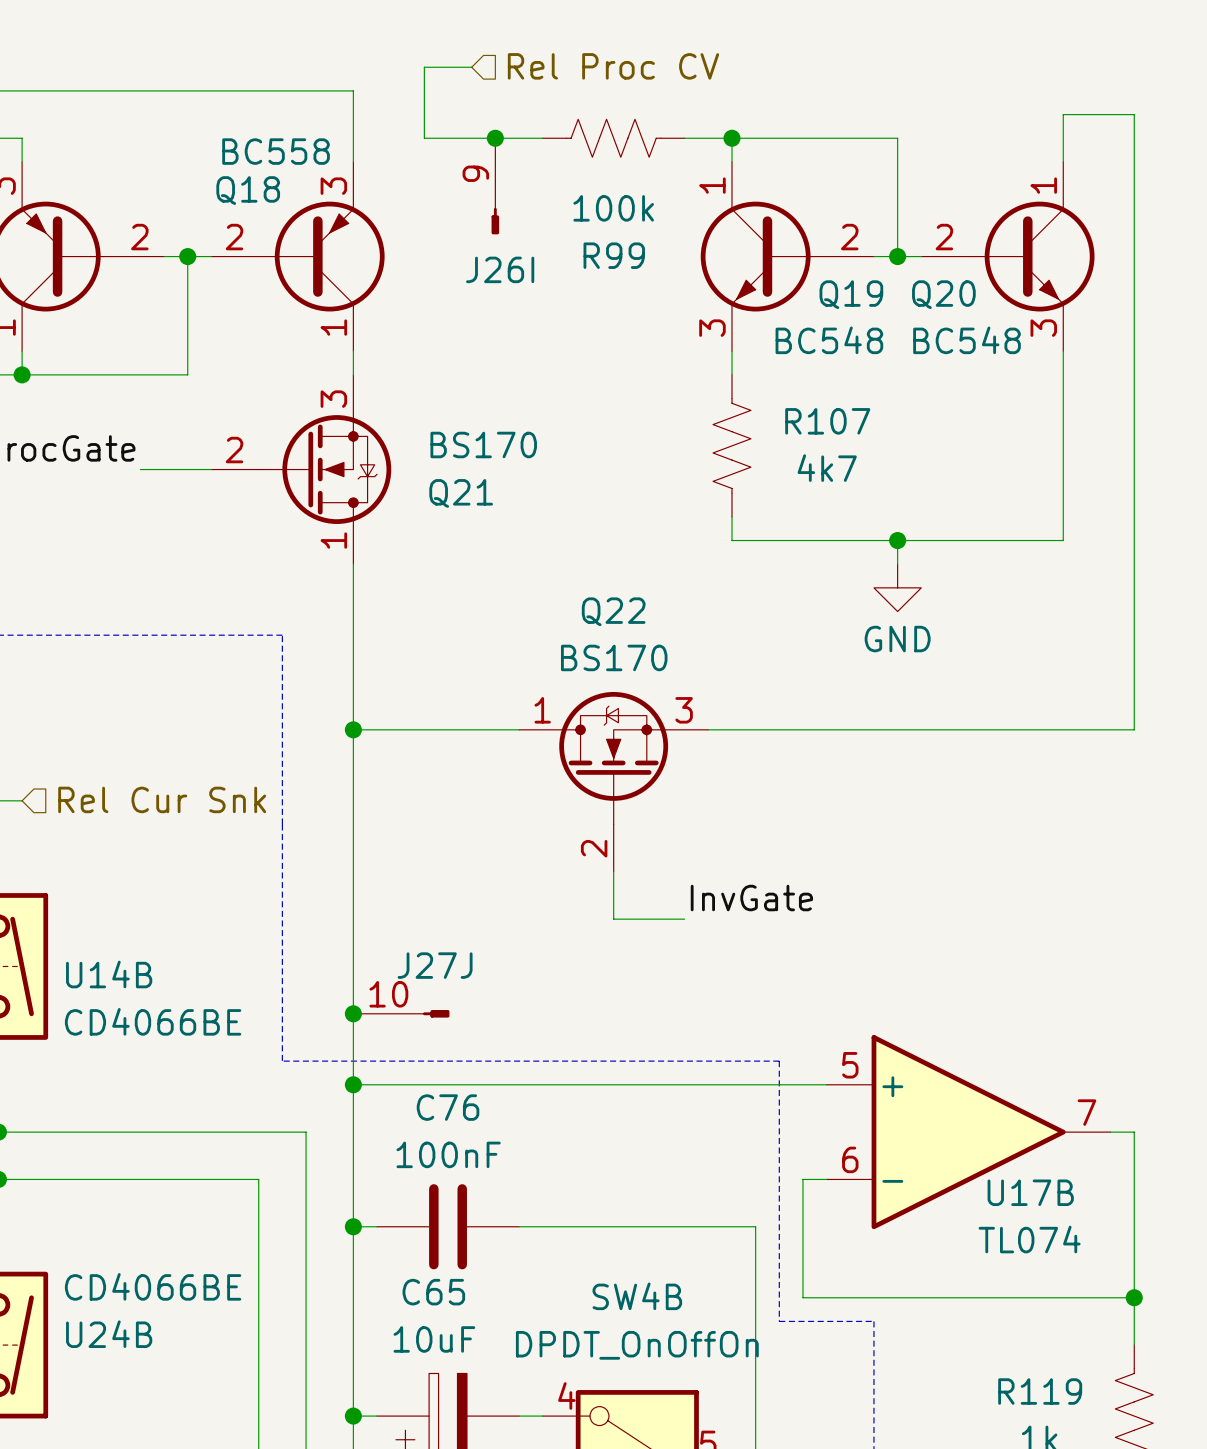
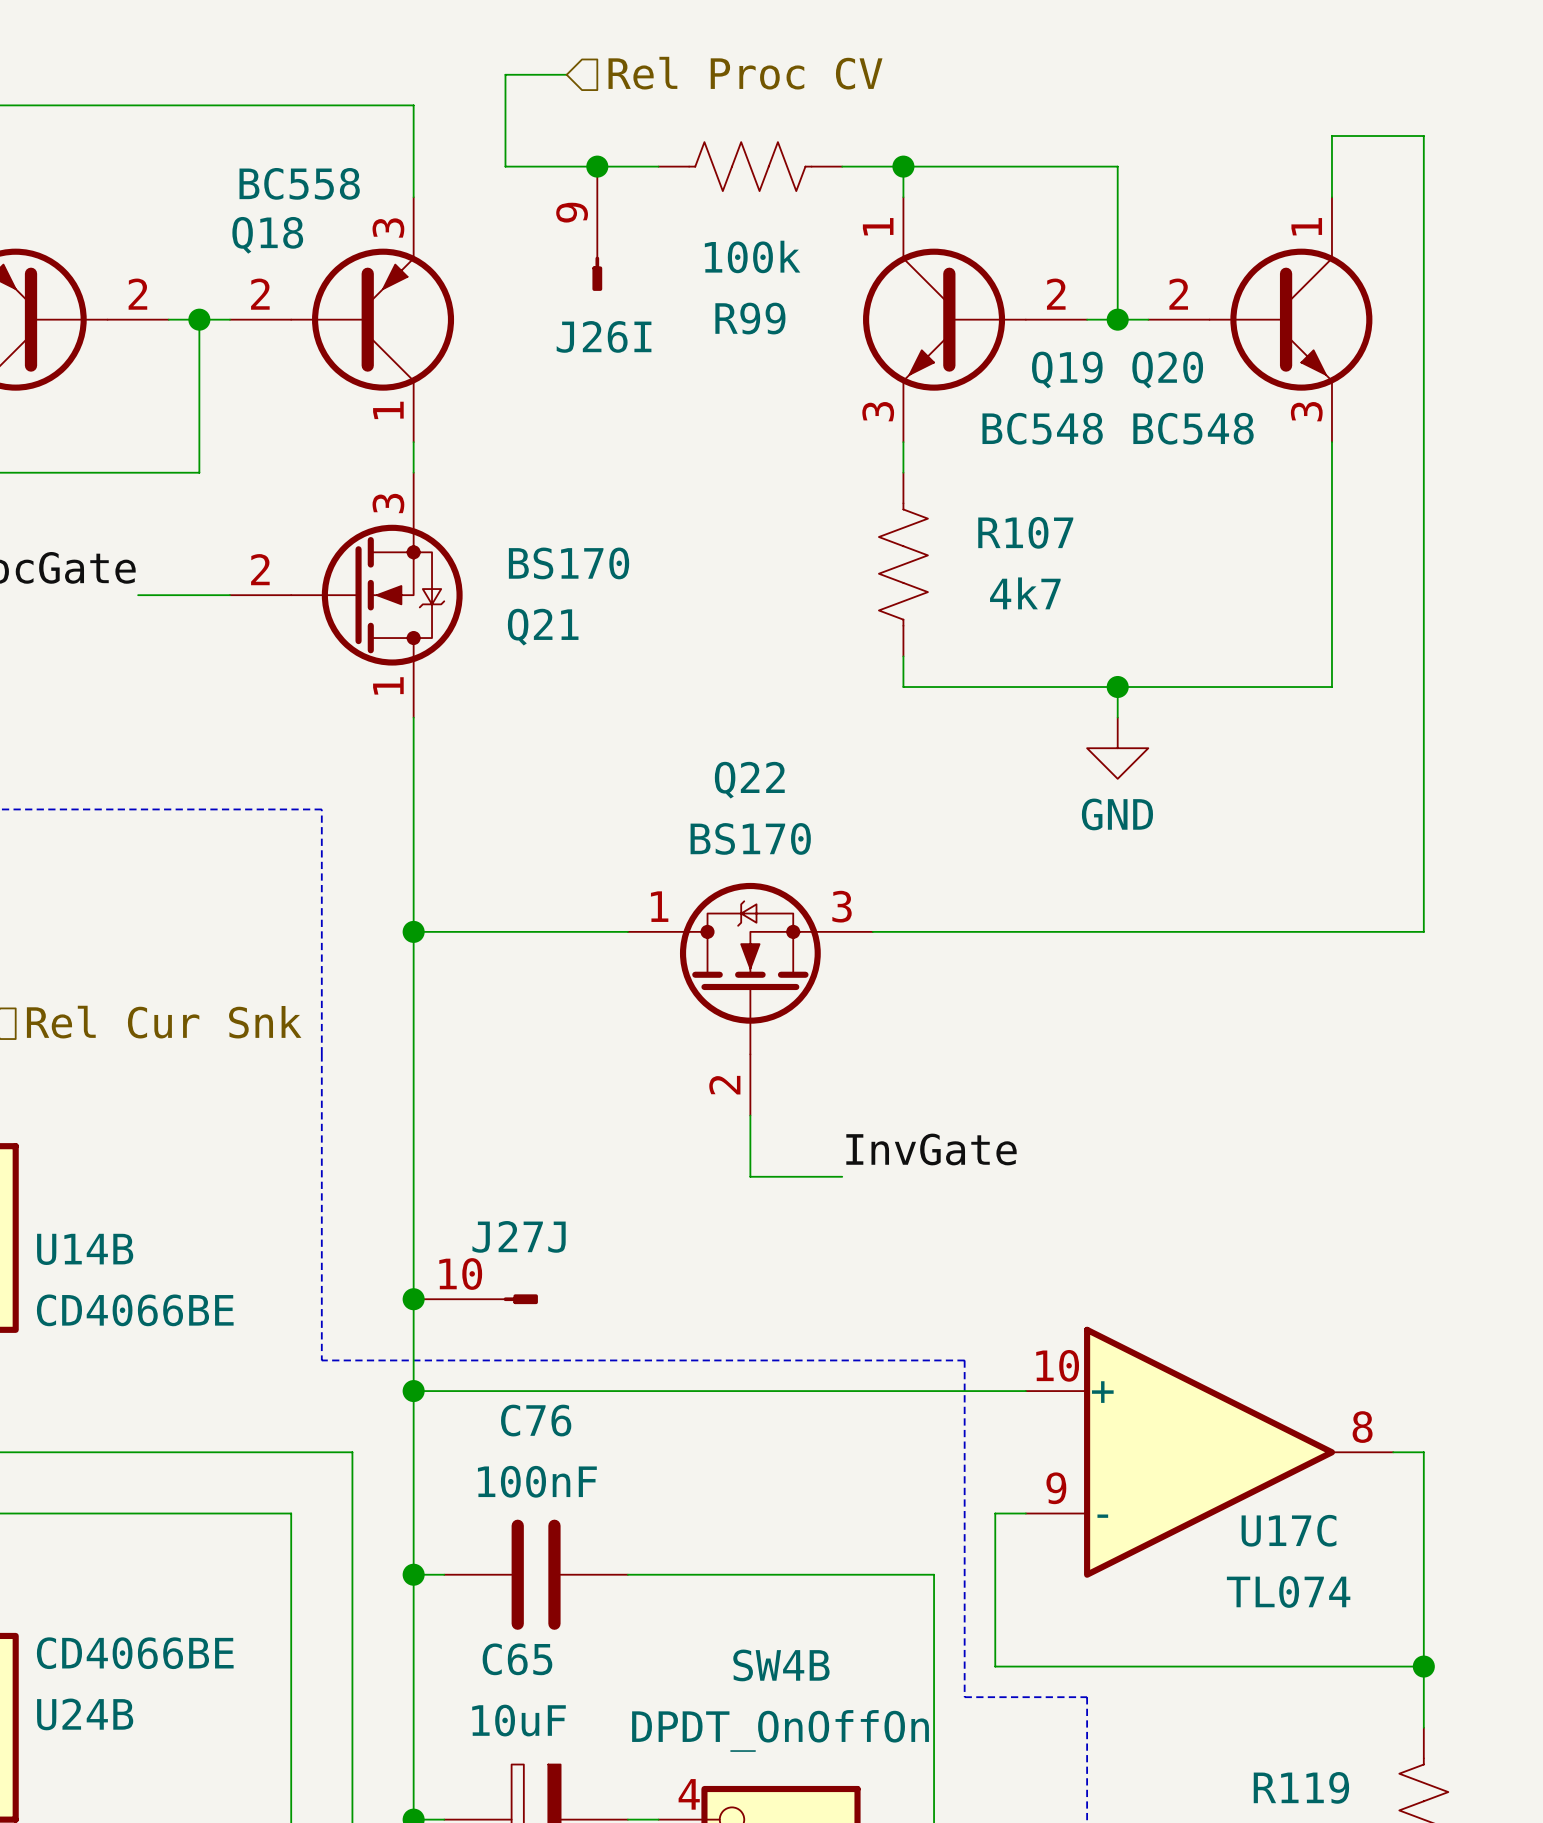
U17B pin number: 5 (850, 1065) -> 10 (1057, 1365)
U17B pin number: 7 (1086, 1112) -> 8 (1362, 1427)
U17B pin number: 6 (850, 1159) -> 9 (1056, 1488)
U17B name: U17B (1030, 1192) -> U17C (1288, 1530)

